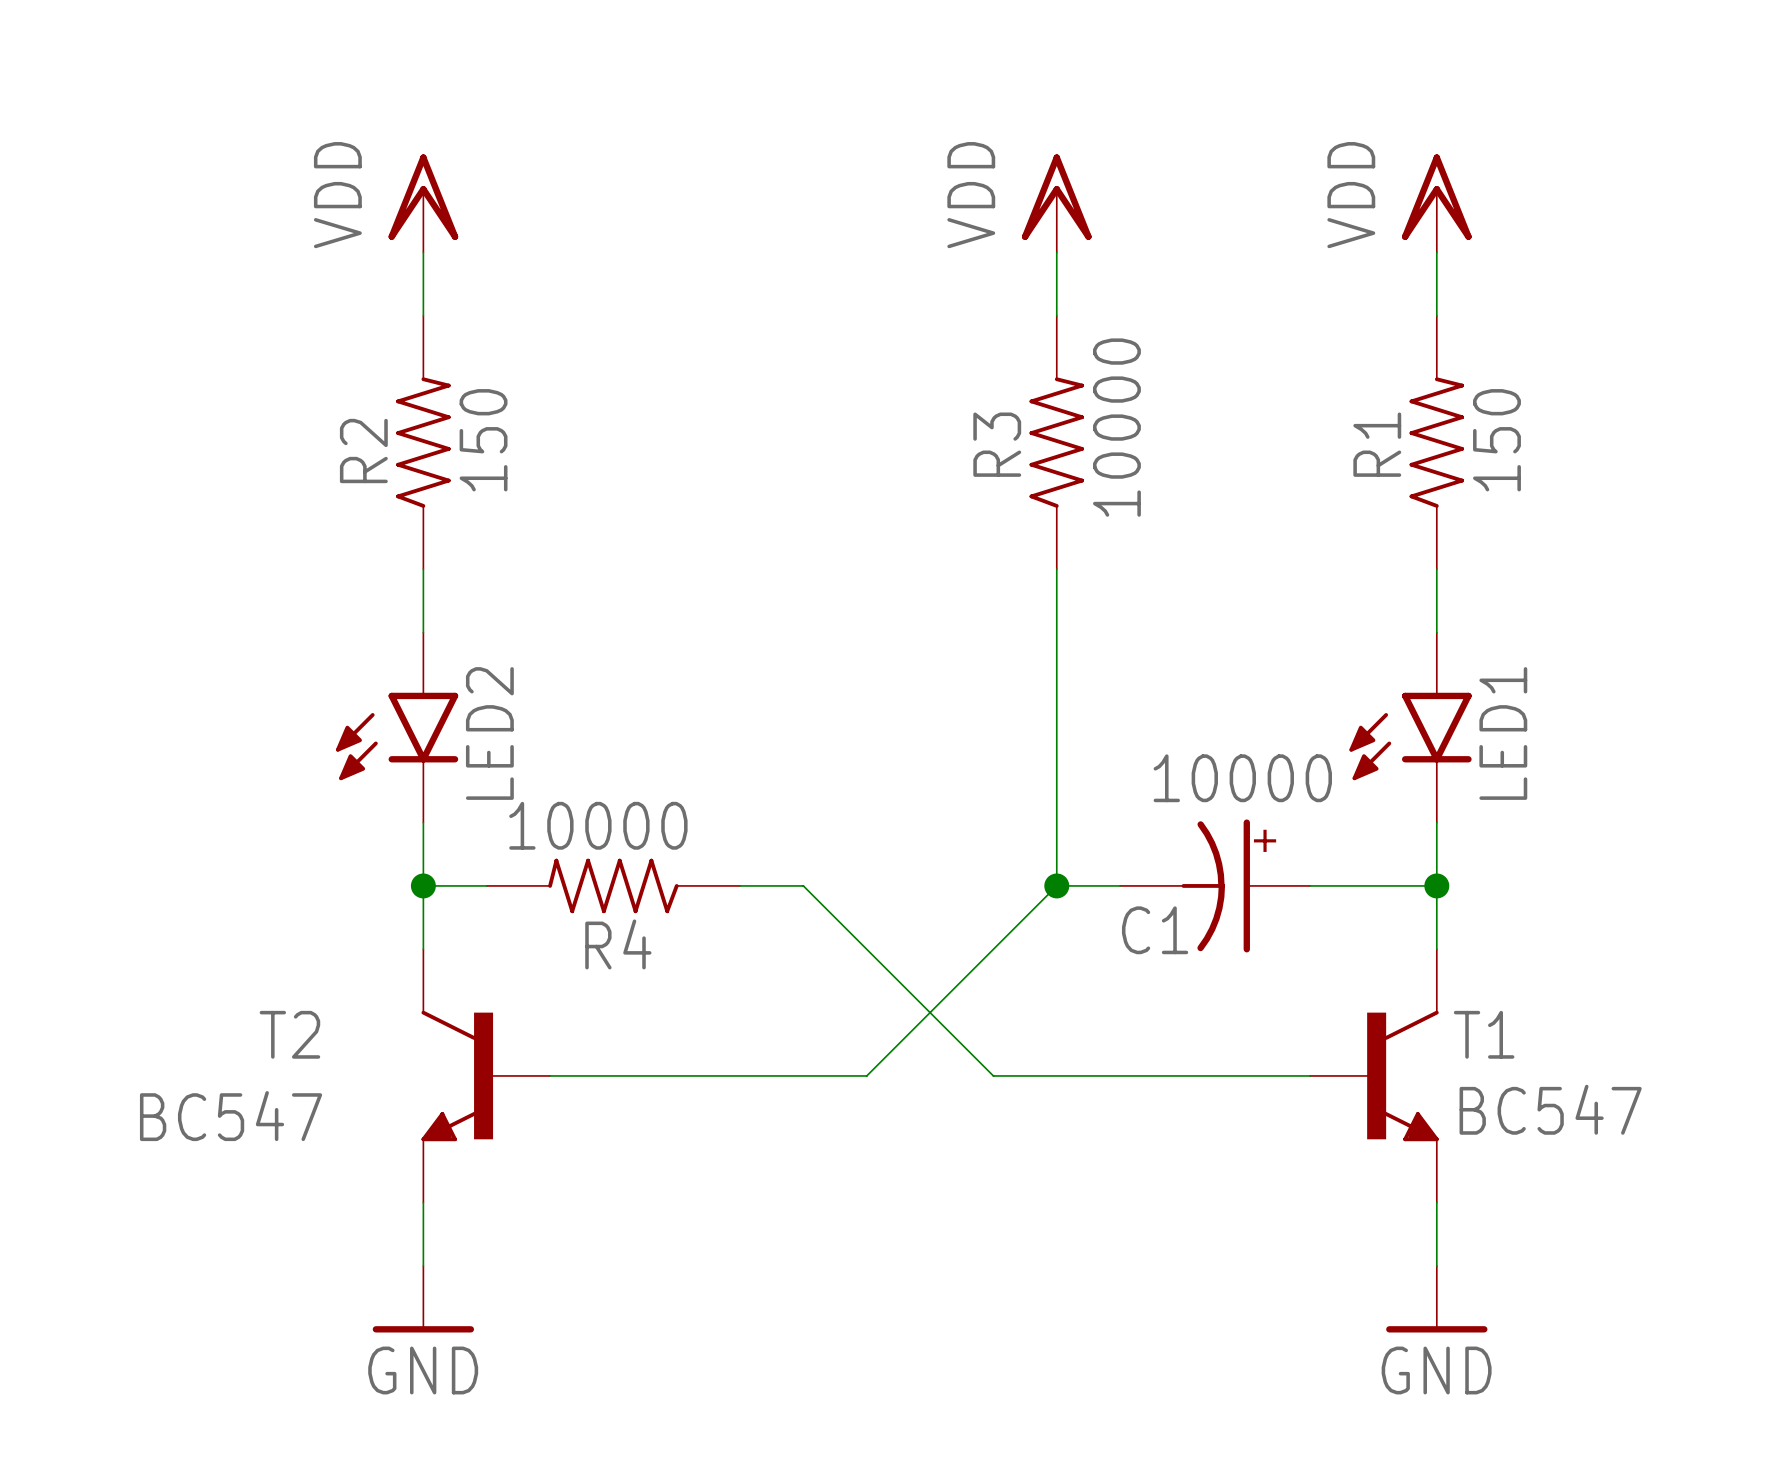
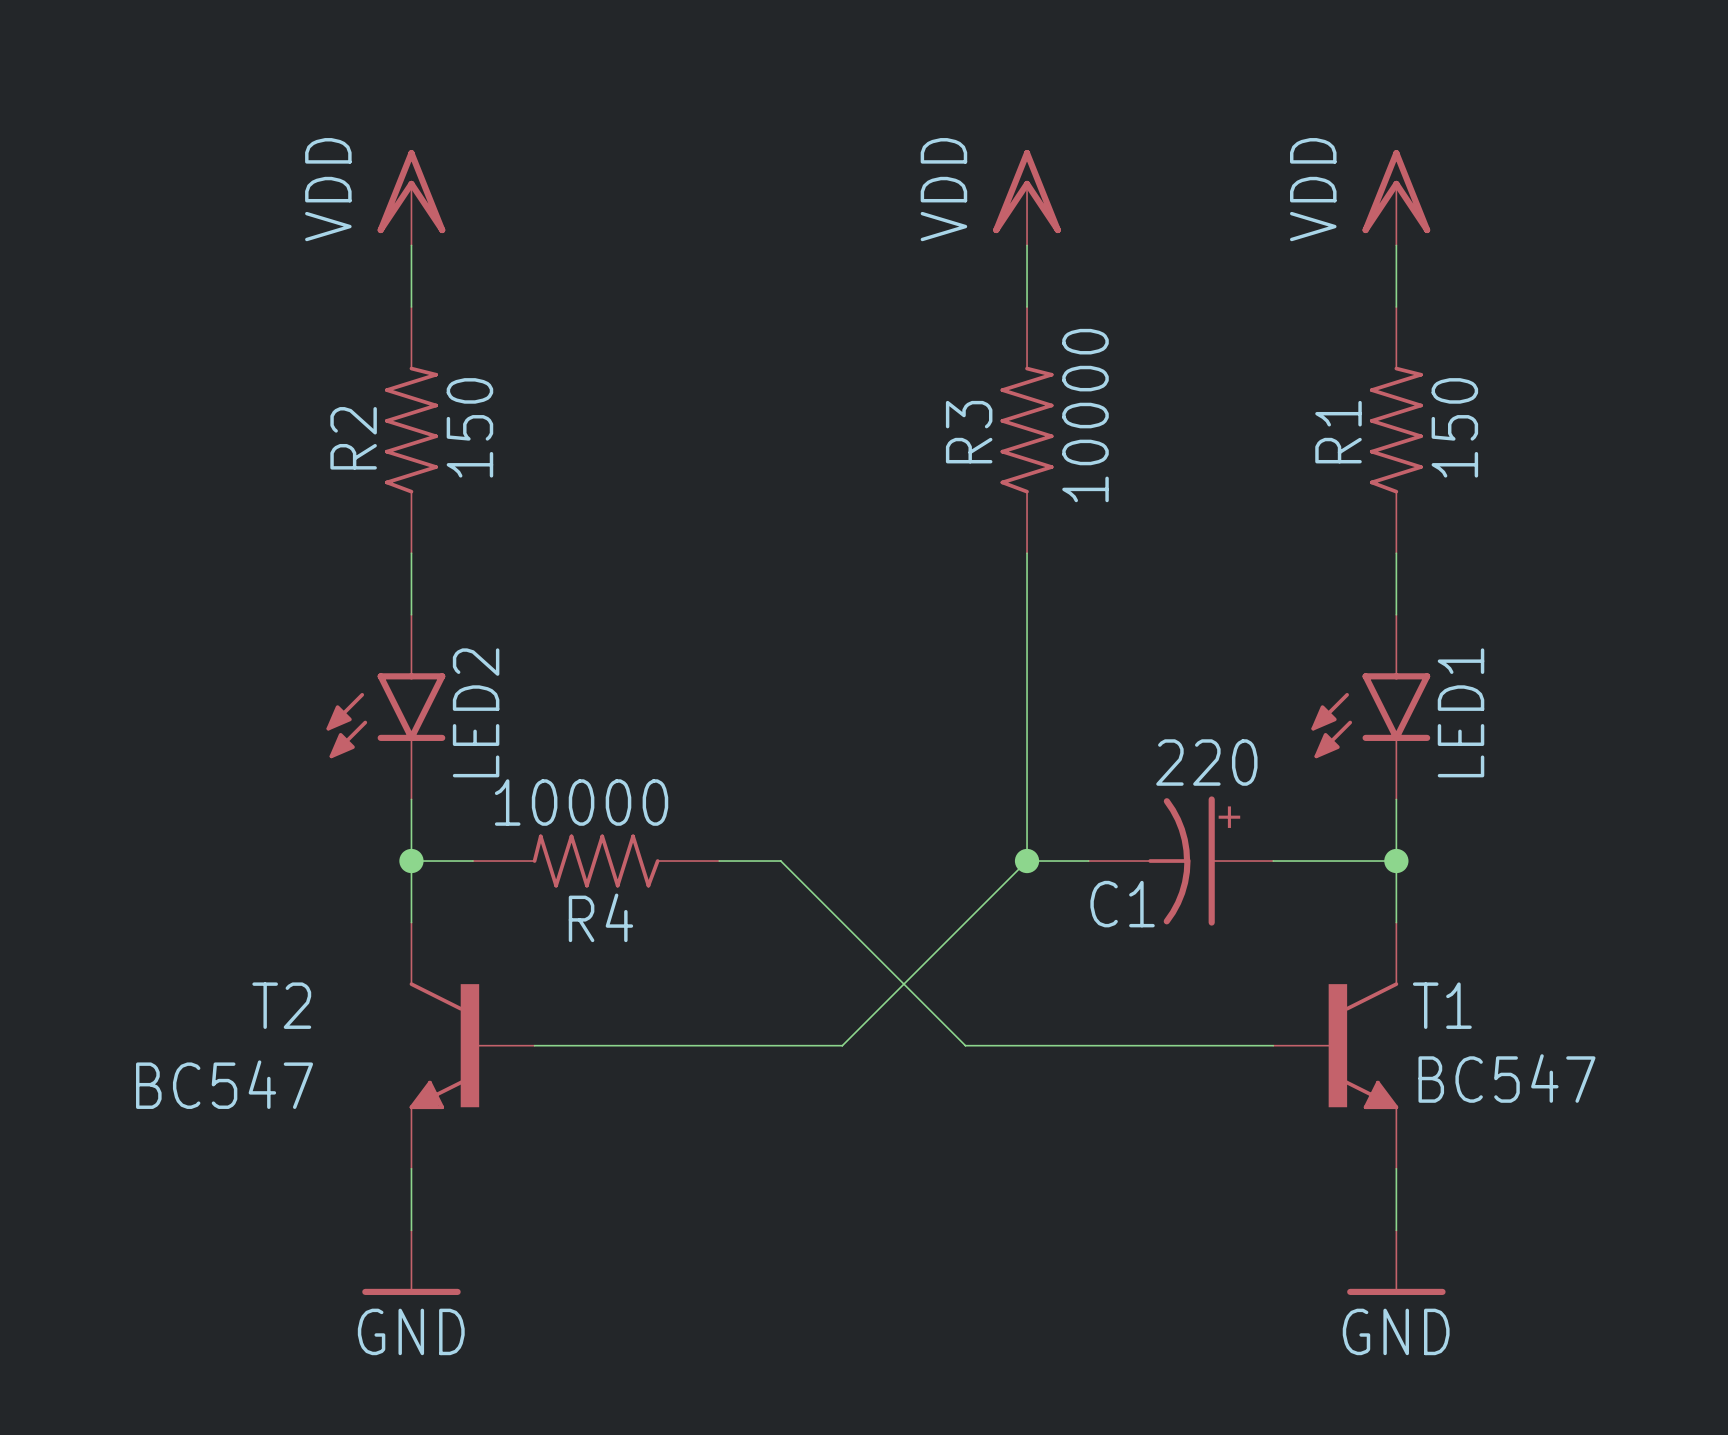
C1 value: 10000 (1242, 778) -> 220 (1206, 762)

